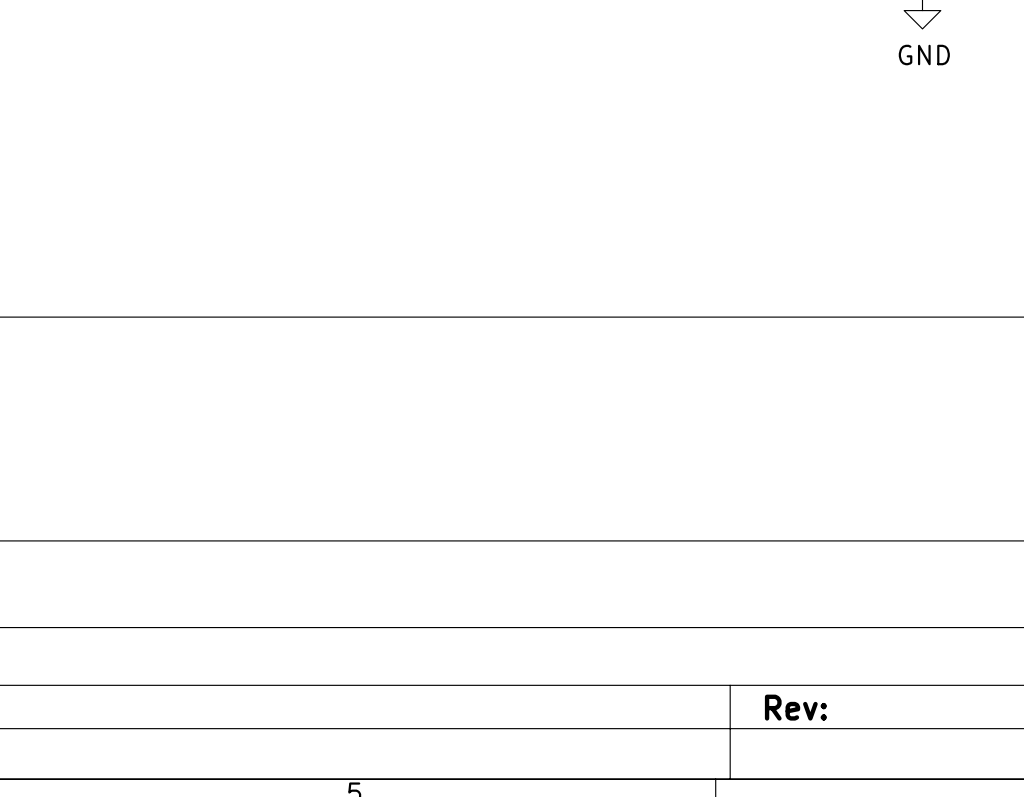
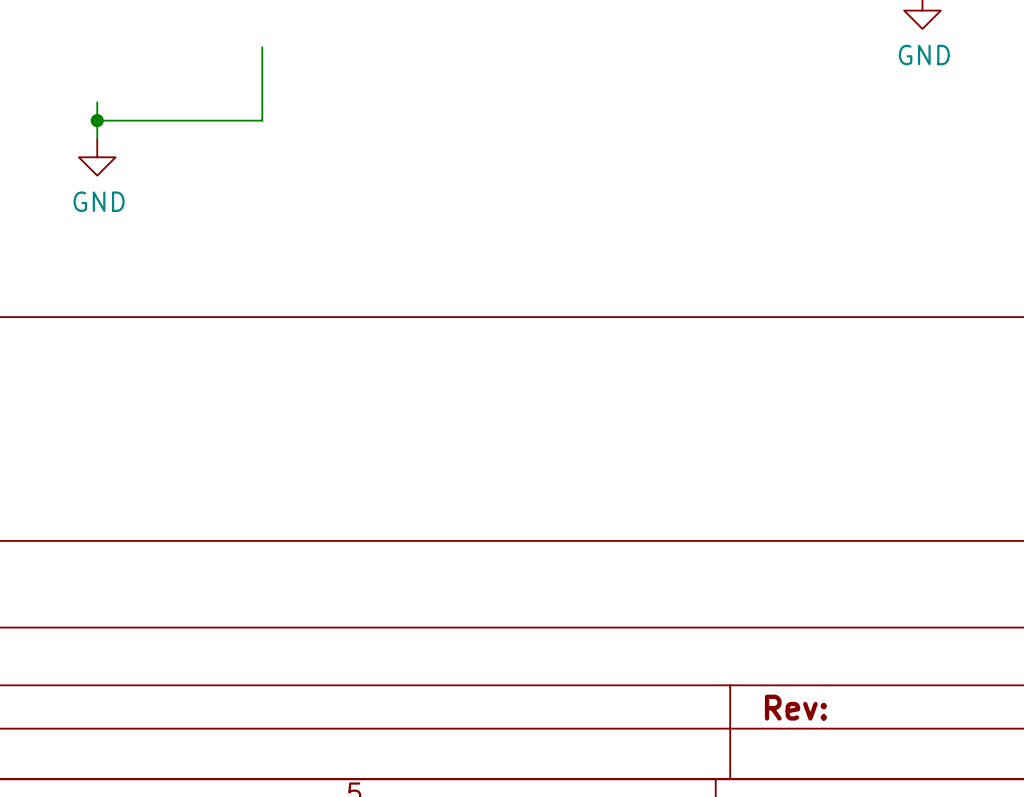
wire: none -> (262, 47) (262, 120) (97, 120)
wire: none -> (97, 102) (97, 138)
junction: none -> (97, 120)
power symbol: none -> GND (97, 157)

